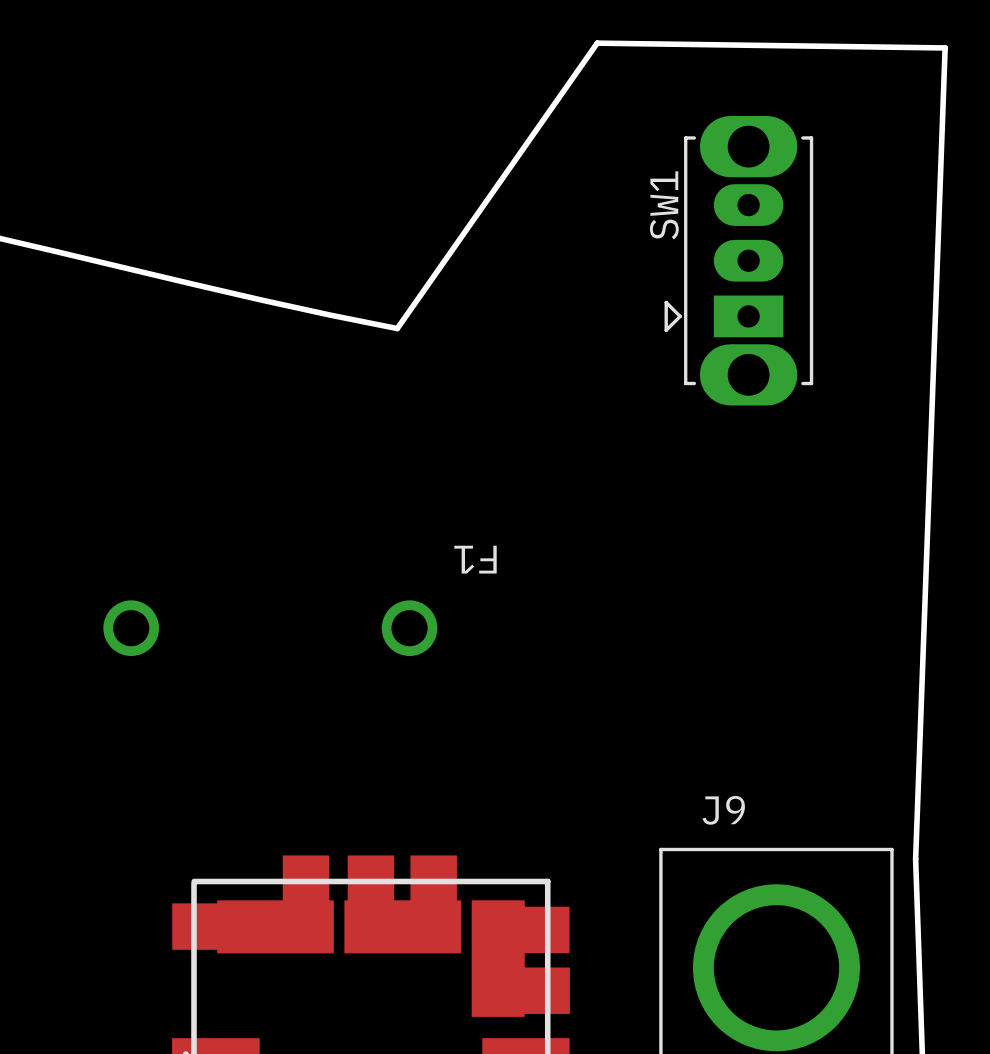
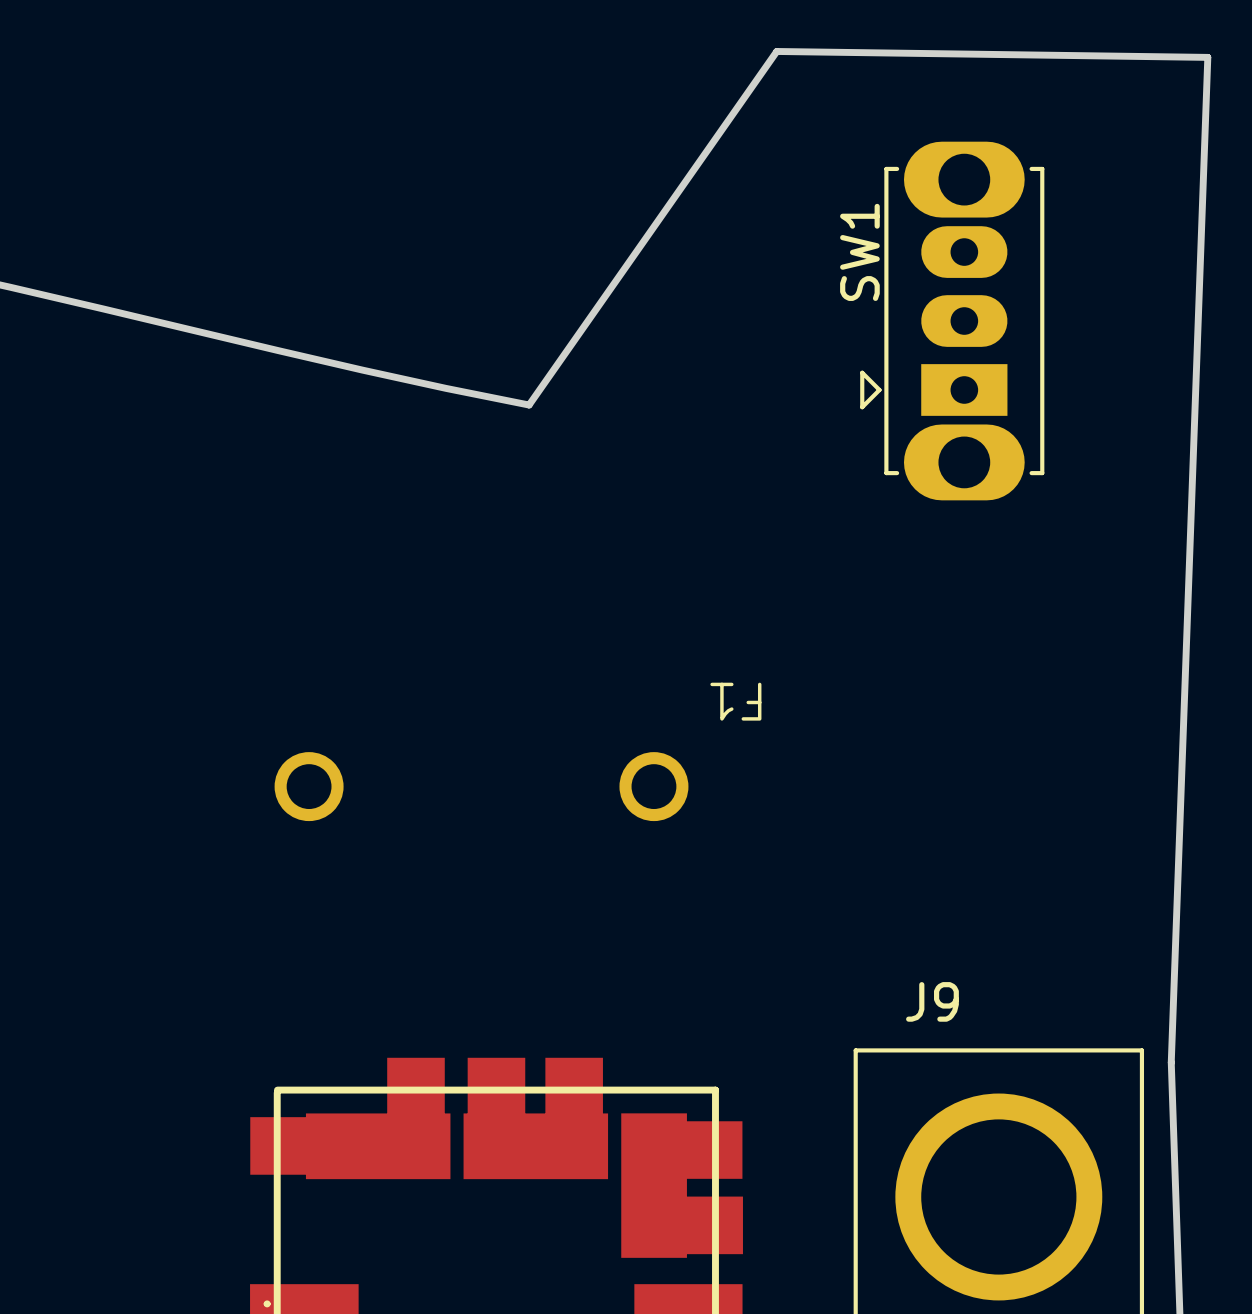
F1 position: (270, 628) -> (481, 786)

